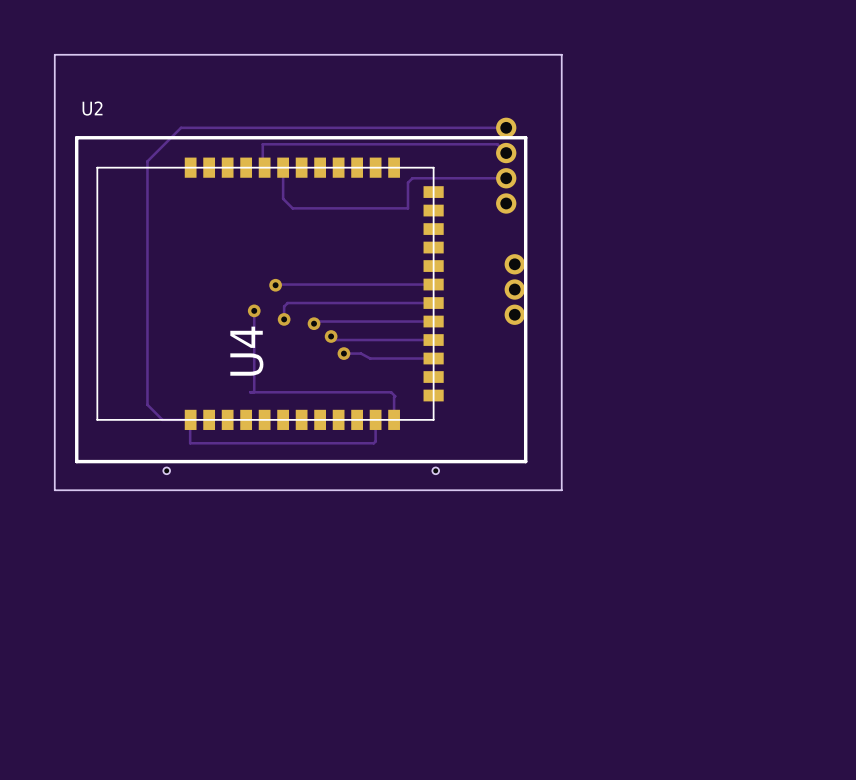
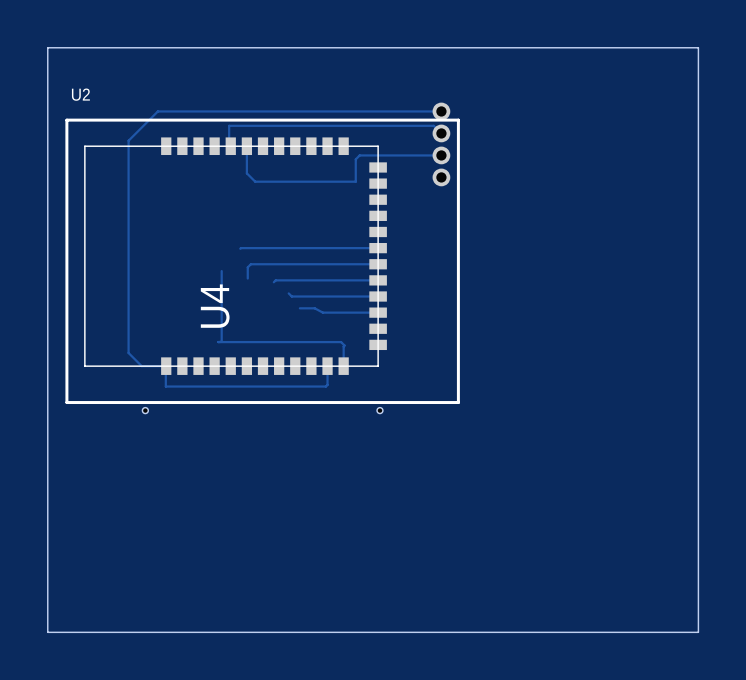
board edge: (561, 54) (561, 490) (54, 490) -> (489, 47) (698, 47) (698, 632) (47, 632) (47, 427)
via: (275, 285) -> none
part: (514, 289) -> none
via: (254, 310) -> none
via: (284, 319) -> none
via: (314, 323) -> none
via: (331, 336) -> none
via: (343, 353) -> none

